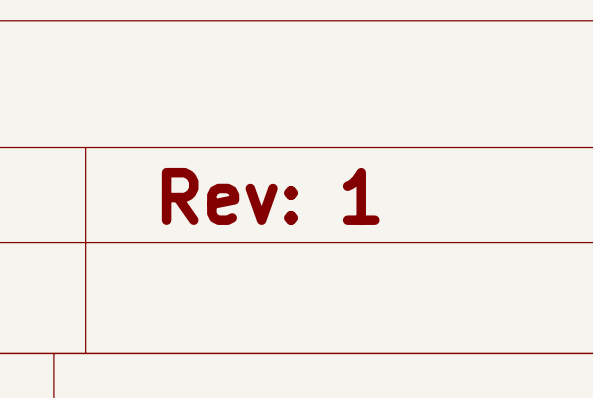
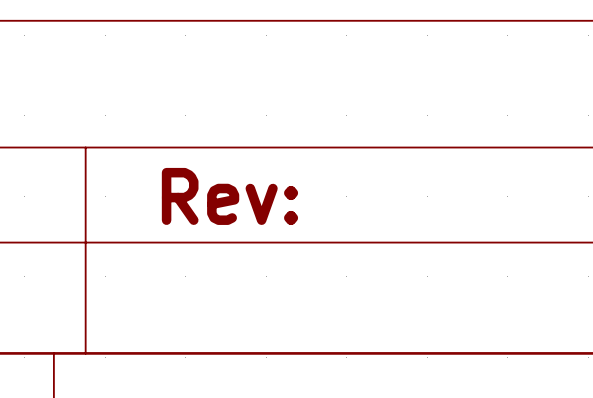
title block: Rev: 1 (270, 196) -> Rev: (229, 196)

